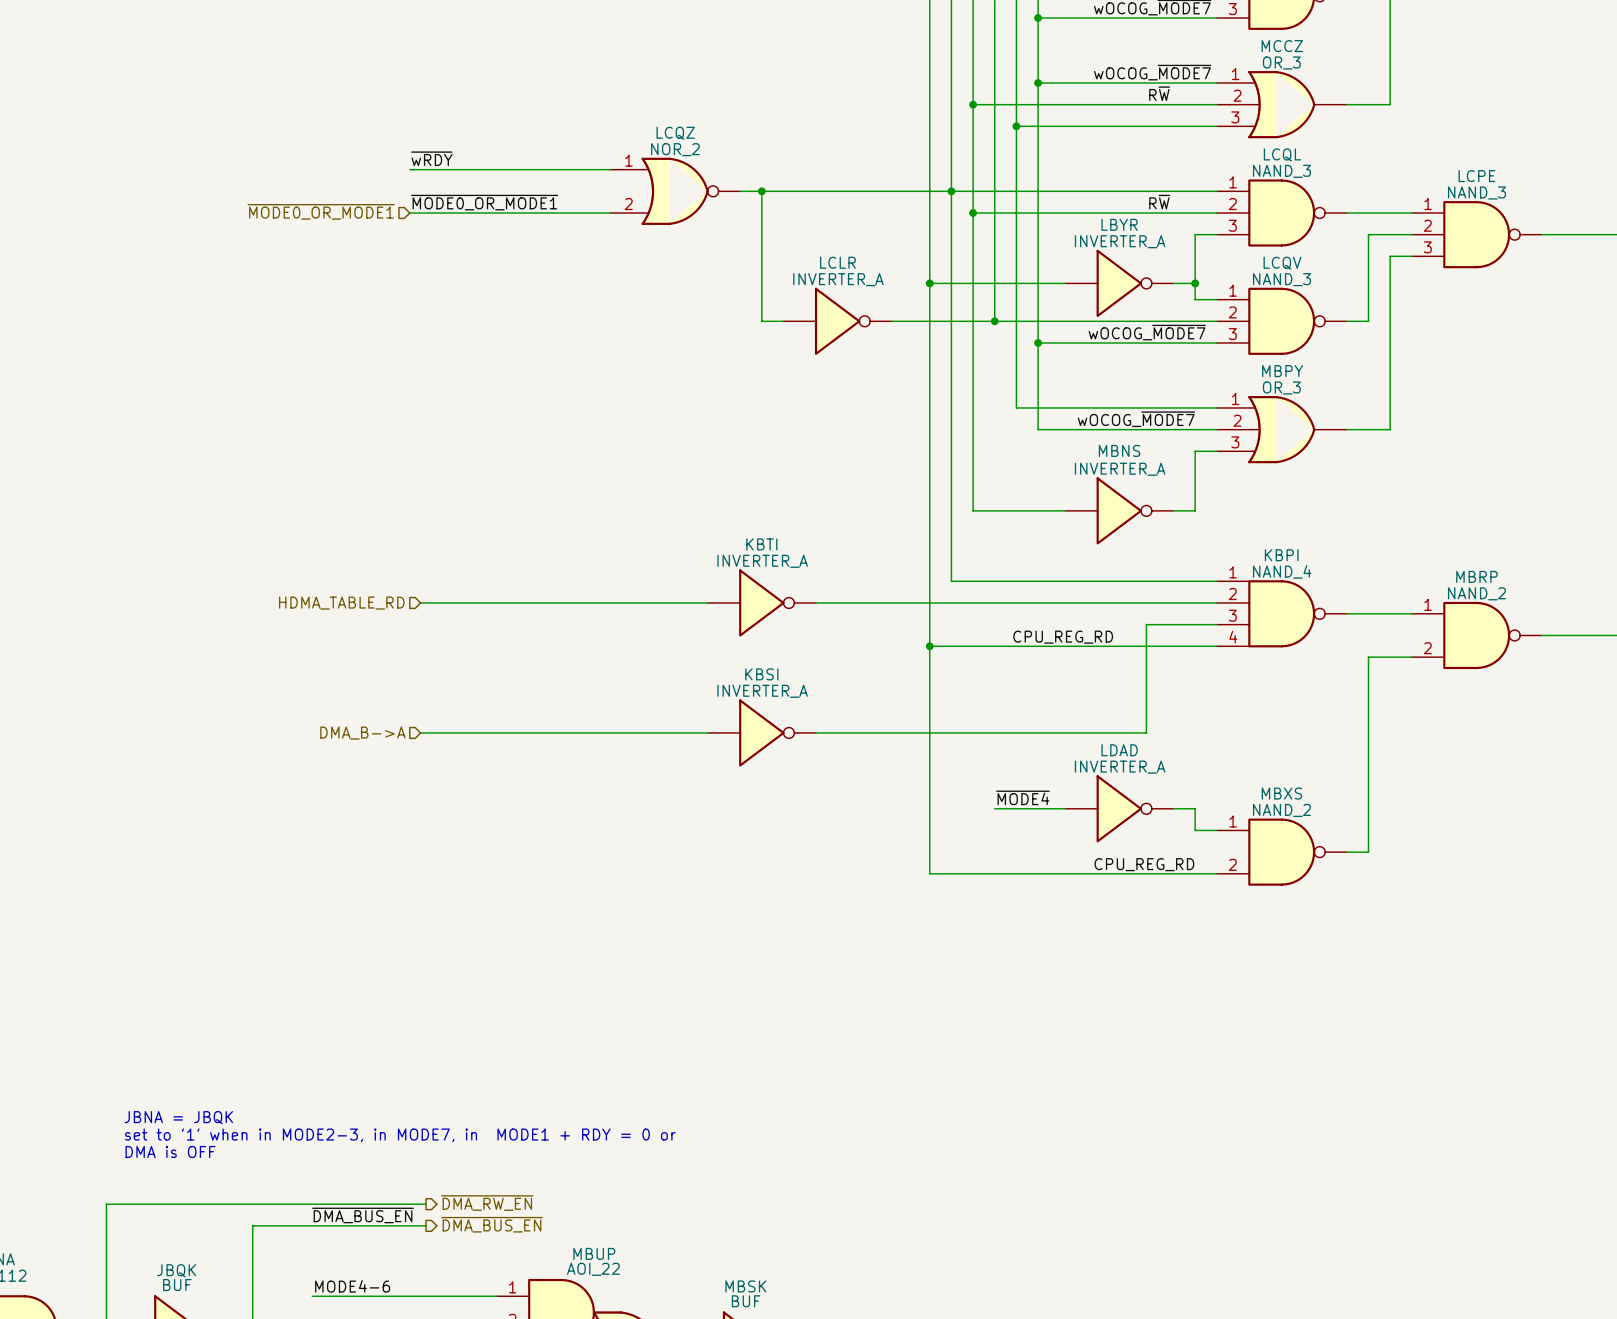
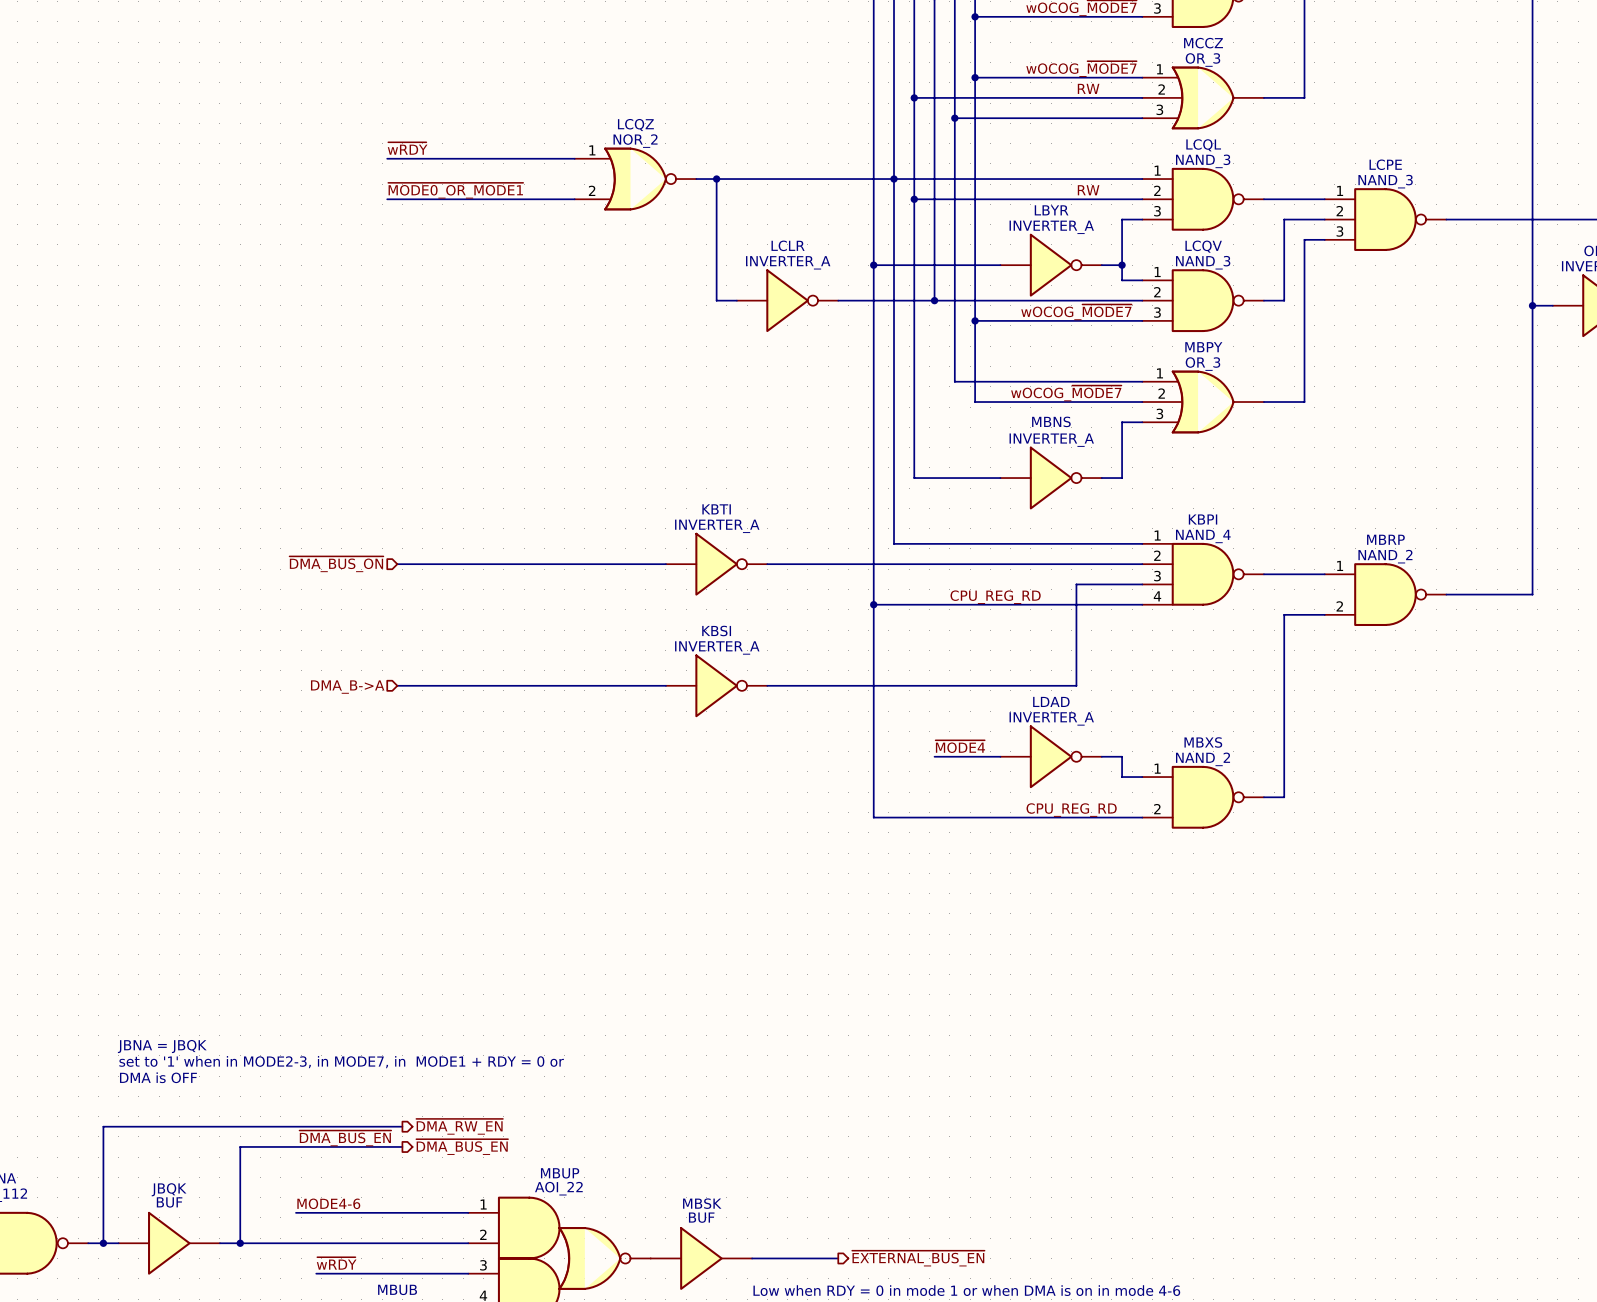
label: R~{W} (1159, 93) -> RW (1088, 88)
label: R~{W} (1159, 202) -> RW (1088, 190)
hierarchical label: ~{MODE0_OR_MODE1} (321, 211) -> none
hierarchical label: HDMA_TABLE_RD (341, 603) -> ~{DMA_BUS_ON} (336, 564)

